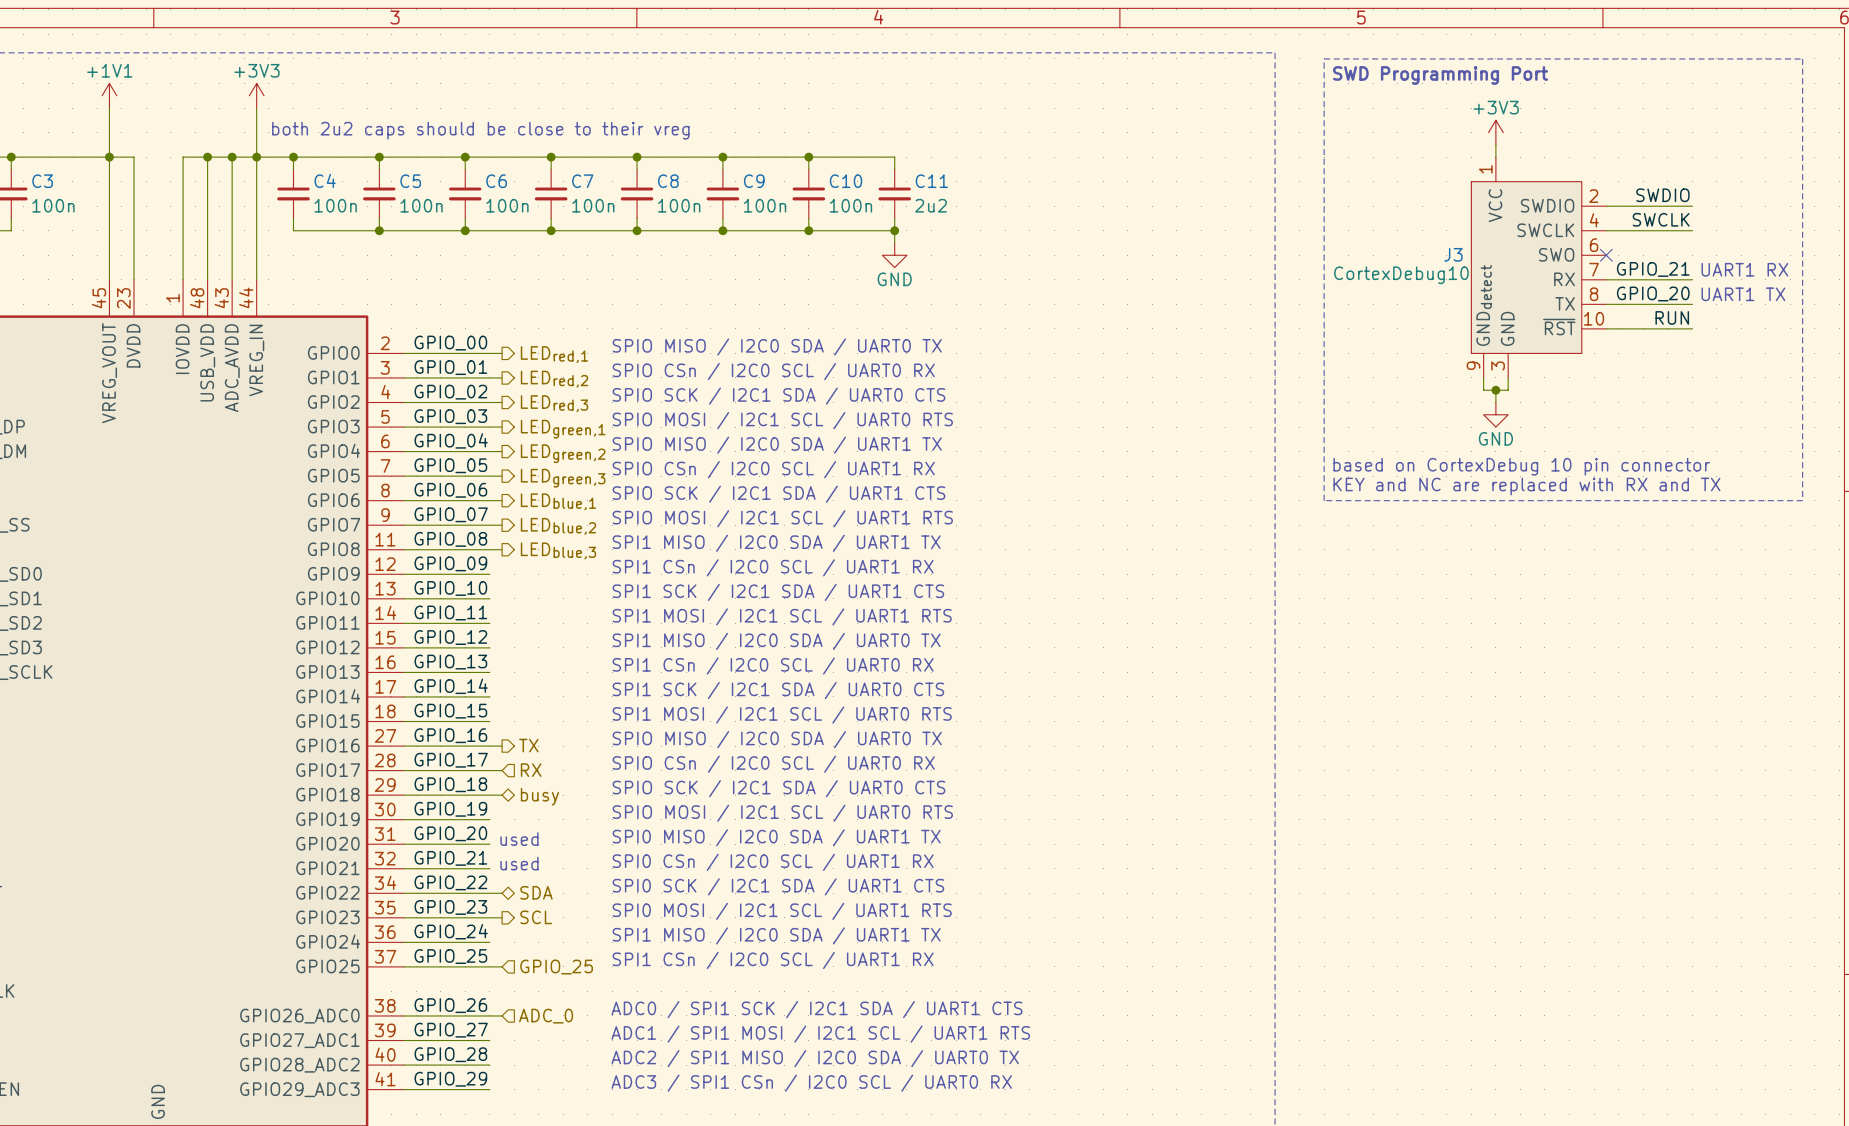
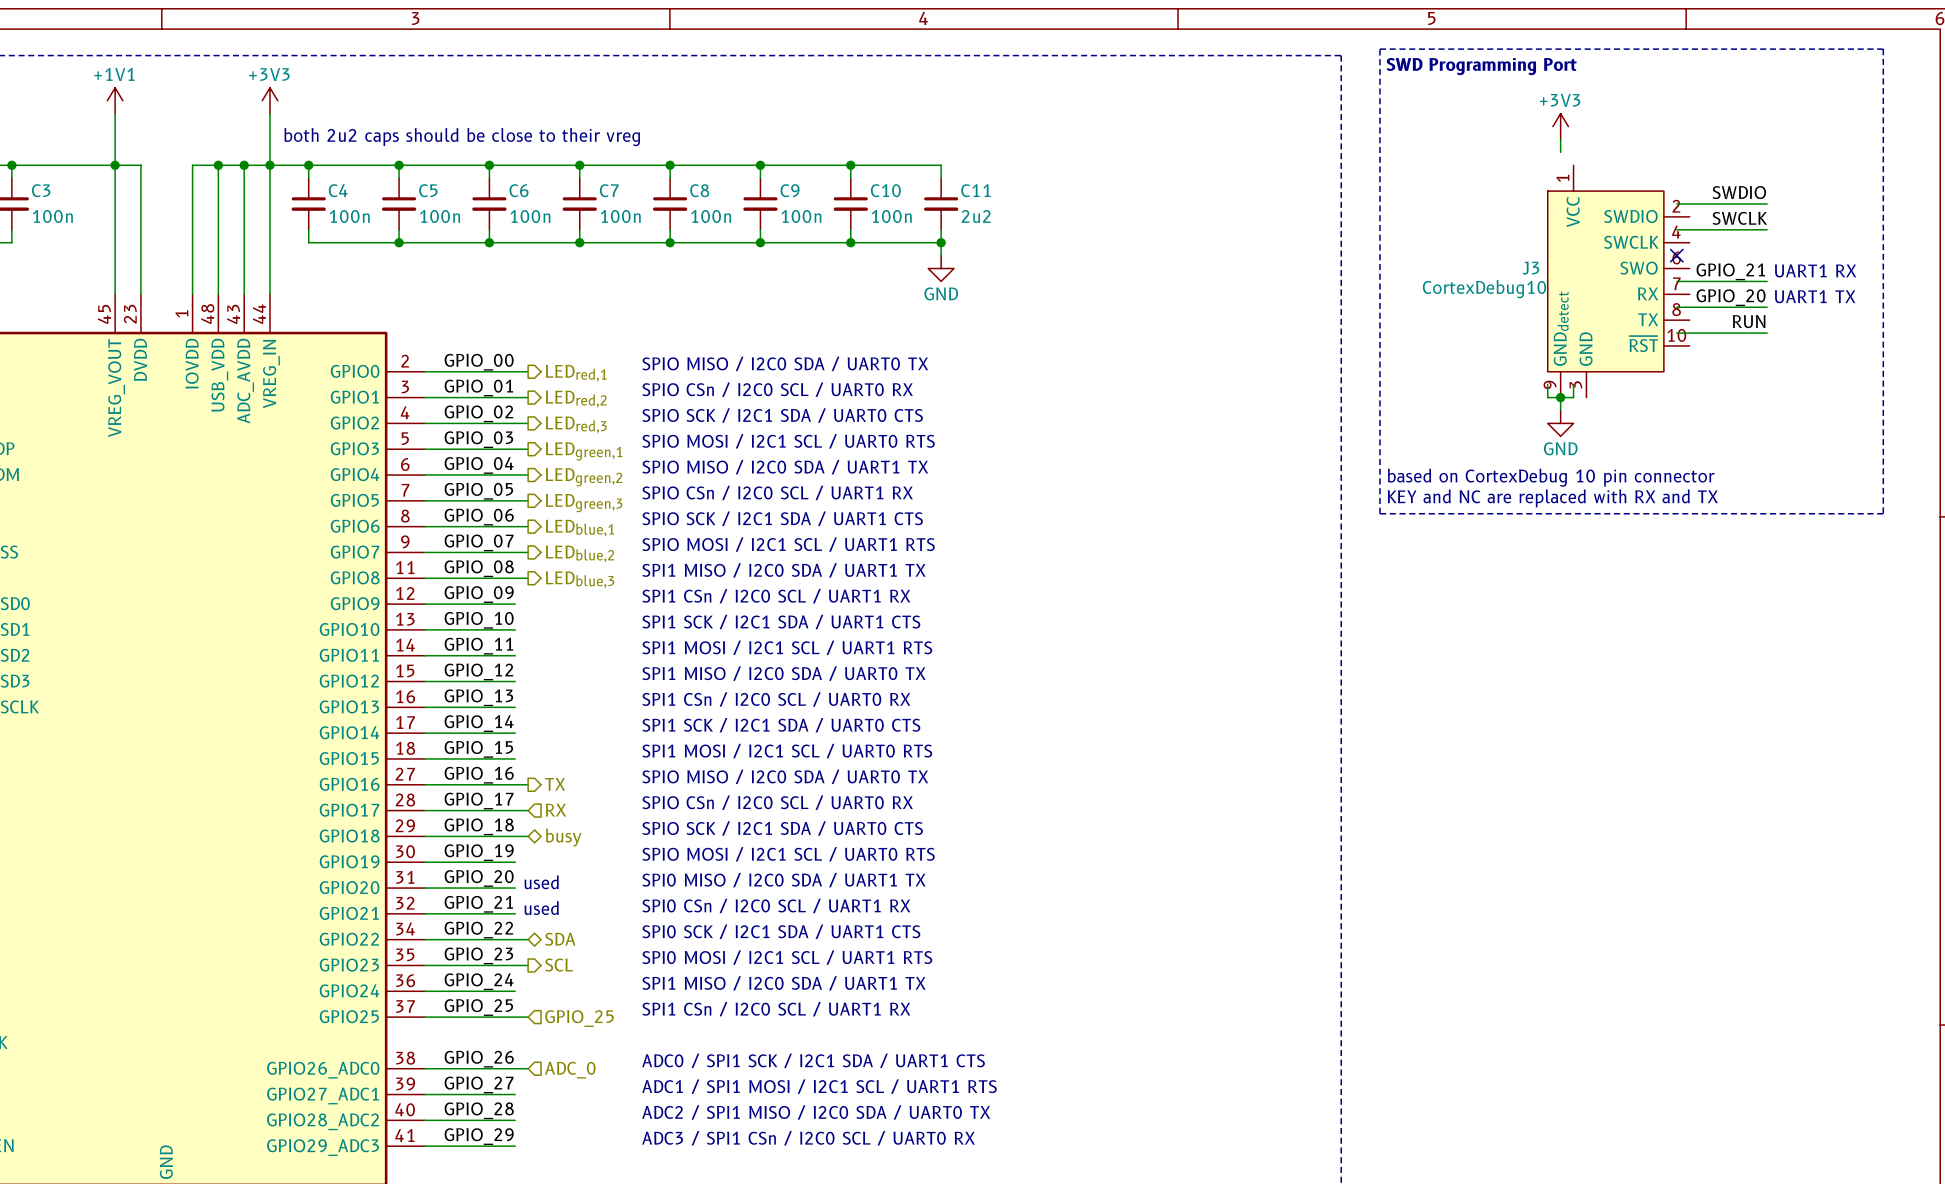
line: (1324, 58) (1802, 58) (1802, 500) (1324, 500) (1324, 58) -> (1379, 49) (1883, 49) (1883, 513) (1379, 513) (1379, 49)
text position: SWD Programming Port (1440, 75) -> SWD Programming Port (1481, 66)
power symbol position: +3V3 (1495, 132) -> +3V3 (1560, 126)
wire: (1495, 144) (1495, 157) -> (1560, 139) (1560, 152)
label position: SWDIO (1662, 195) -> SWDIO (1739, 192)
wire: (1606, 206) (1692, 206) -> (1676, 203) (1767, 203)
label position: SWCLK (1661, 219) -> SWCLK (1739, 218)
wire: (1606, 230) (1692, 230) -> (1676, 229) (1767, 229)
no-connect mark position: (1606, 255) -> (1676, 255)
label position: GPIO_21 (1653, 269) -> GPIO_21 (1730, 271)
text position: UART1 RX (1744, 269) -> UART1 RX (1815, 270)
wire: (1606, 279) (1692, 279) -> (1676, 281) (1767, 281)
label position: GPIO_20 (1653, 293) -> GPIO_20 (1731, 297)
text position: UART1 TX (1743, 294) -> UART1 TX (1815, 296)
wire: (1606, 304) (1692, 304) -> (1676, 307) (1767, 307)
label position: RUN (1672, 317) -> RUN (1749, 321)
wire: (1606, 328) (1692, 328) -> (1676, 333) (1767, 333)
wire: none -> (1547, 384) (1547, 397) (1573, 397) (1573, 384)
wire: (1508, 377) (1508, 390) (1483, 390) -> none
wire: (1495, 390) (1495, 402) -> none
junction position: (1495, 390) -> (1560, 397)
power symbol position: GND (1495, 414) -> GND (1560, 423)
text position: based on CortexDebug 10 pin connector (1521, 466) -> based on CortexDebug 10 pin connector (1551, 477)
text position: KEY and NC are replaced with RX and TX (1526, 486) -> KEY and NC are replaced with RX and TX (1552, 498)

